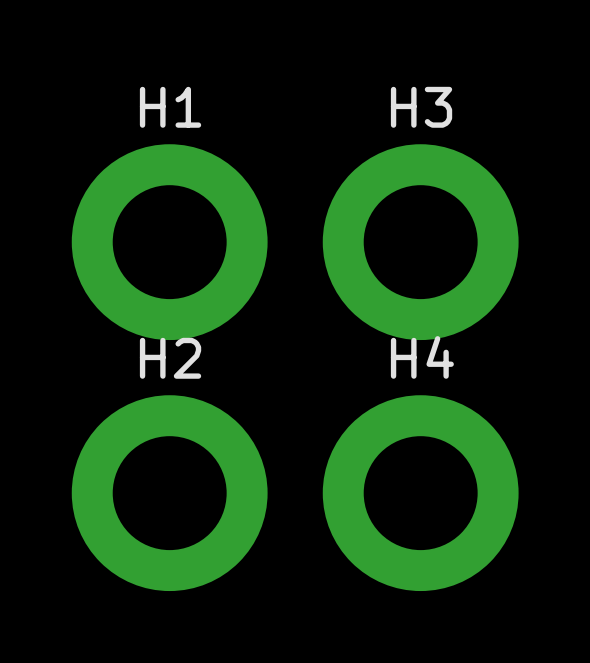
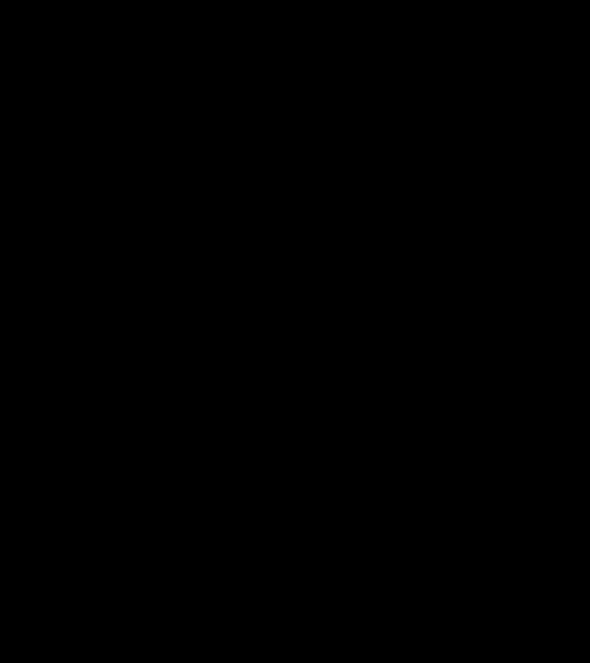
H1: (169, 242) -> none
H3: (420, 242) -> none
H2: (169, 493) -> none
H4: (420, 493) -> none

